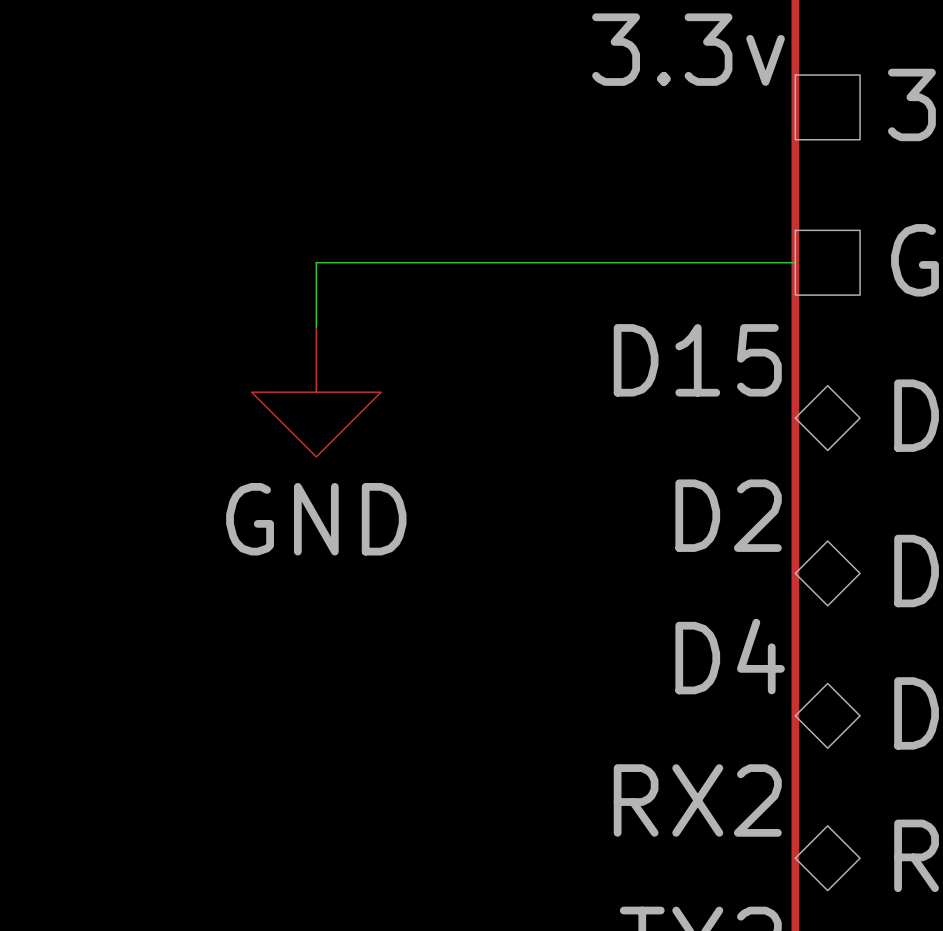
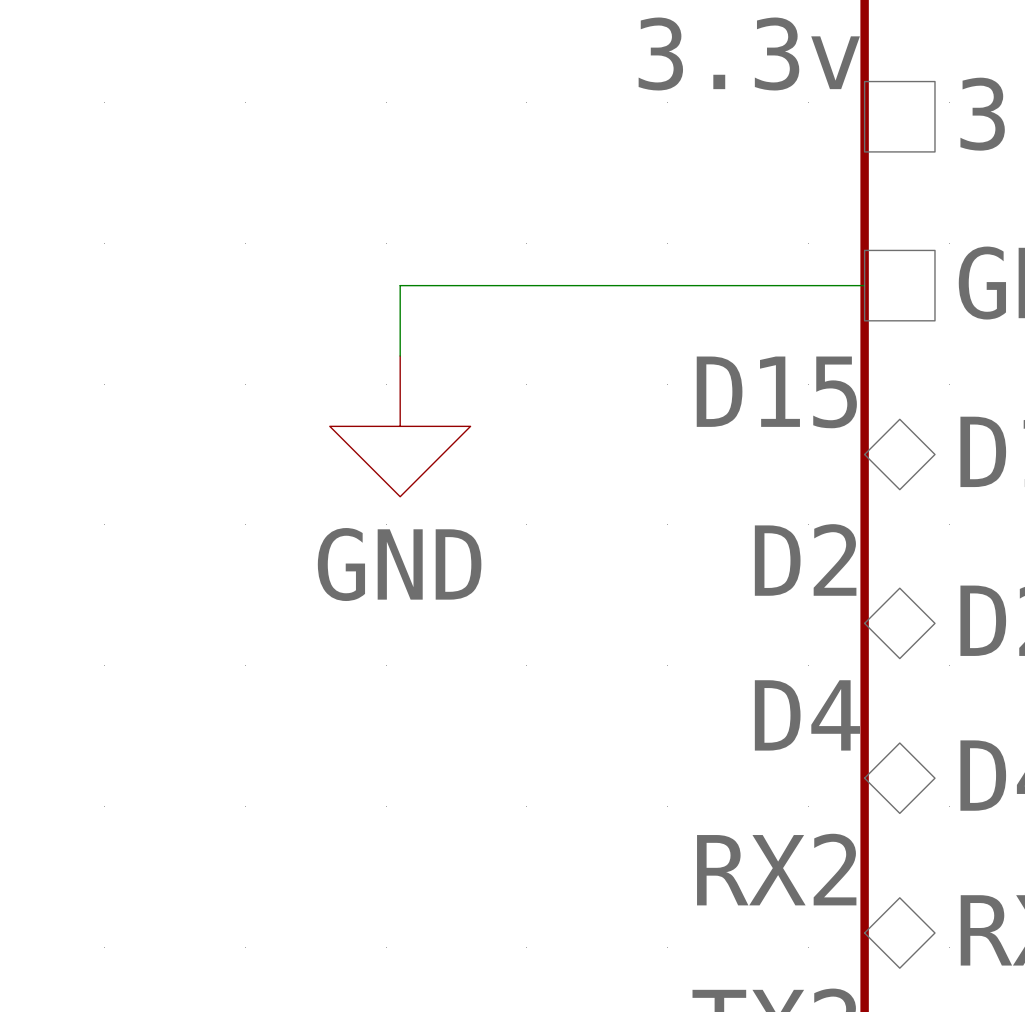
wire: (368, 262) (316, 262) (316, 327) -> (400, 285) (400, 355)
power symbol position: GND (316, 392) -> GND (400, 426)

